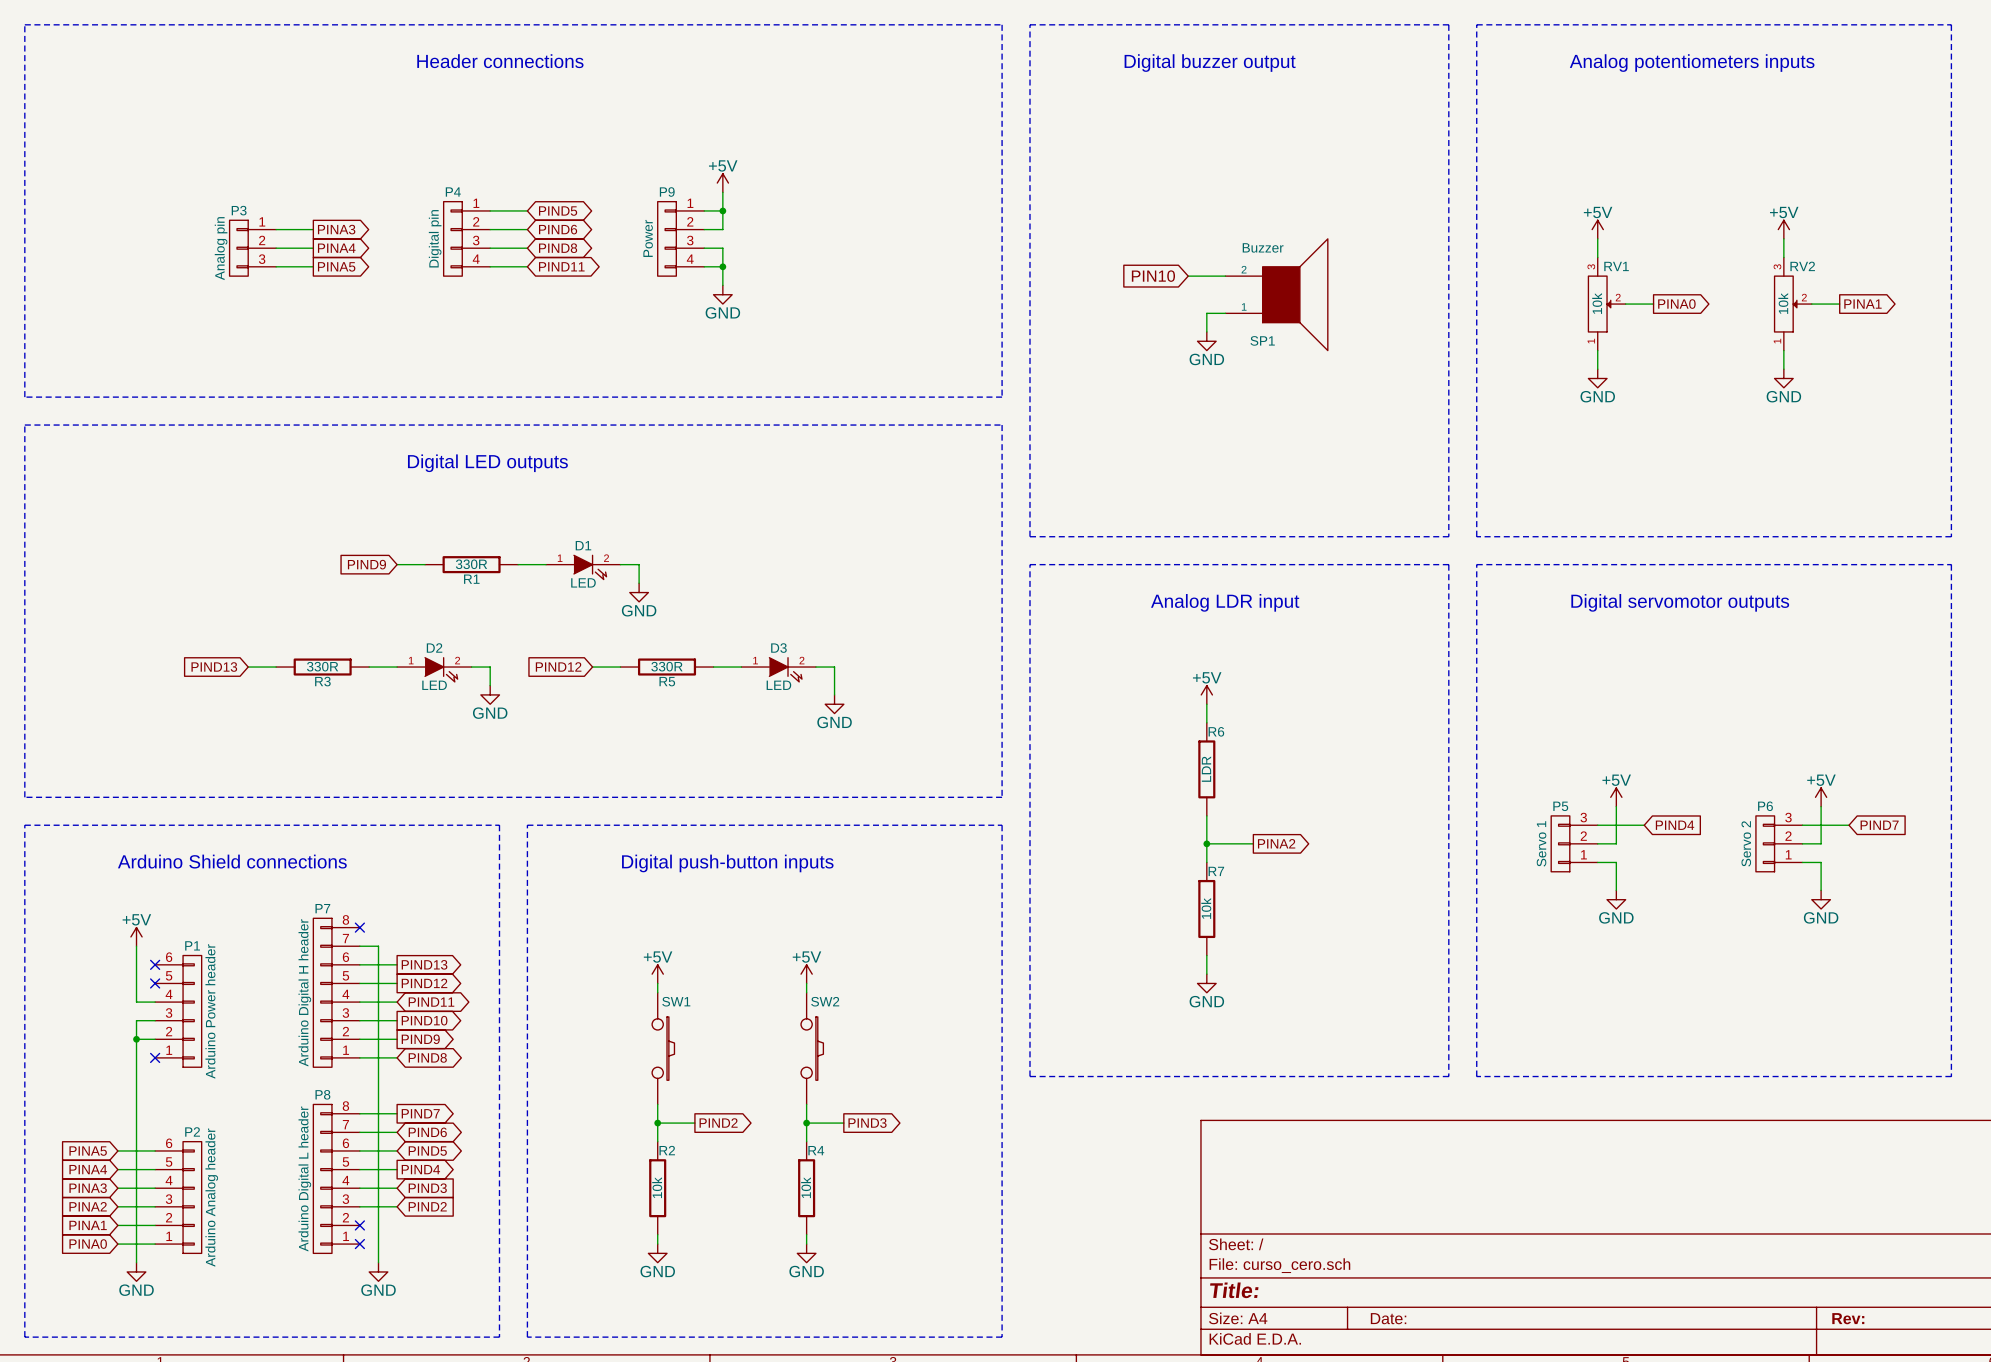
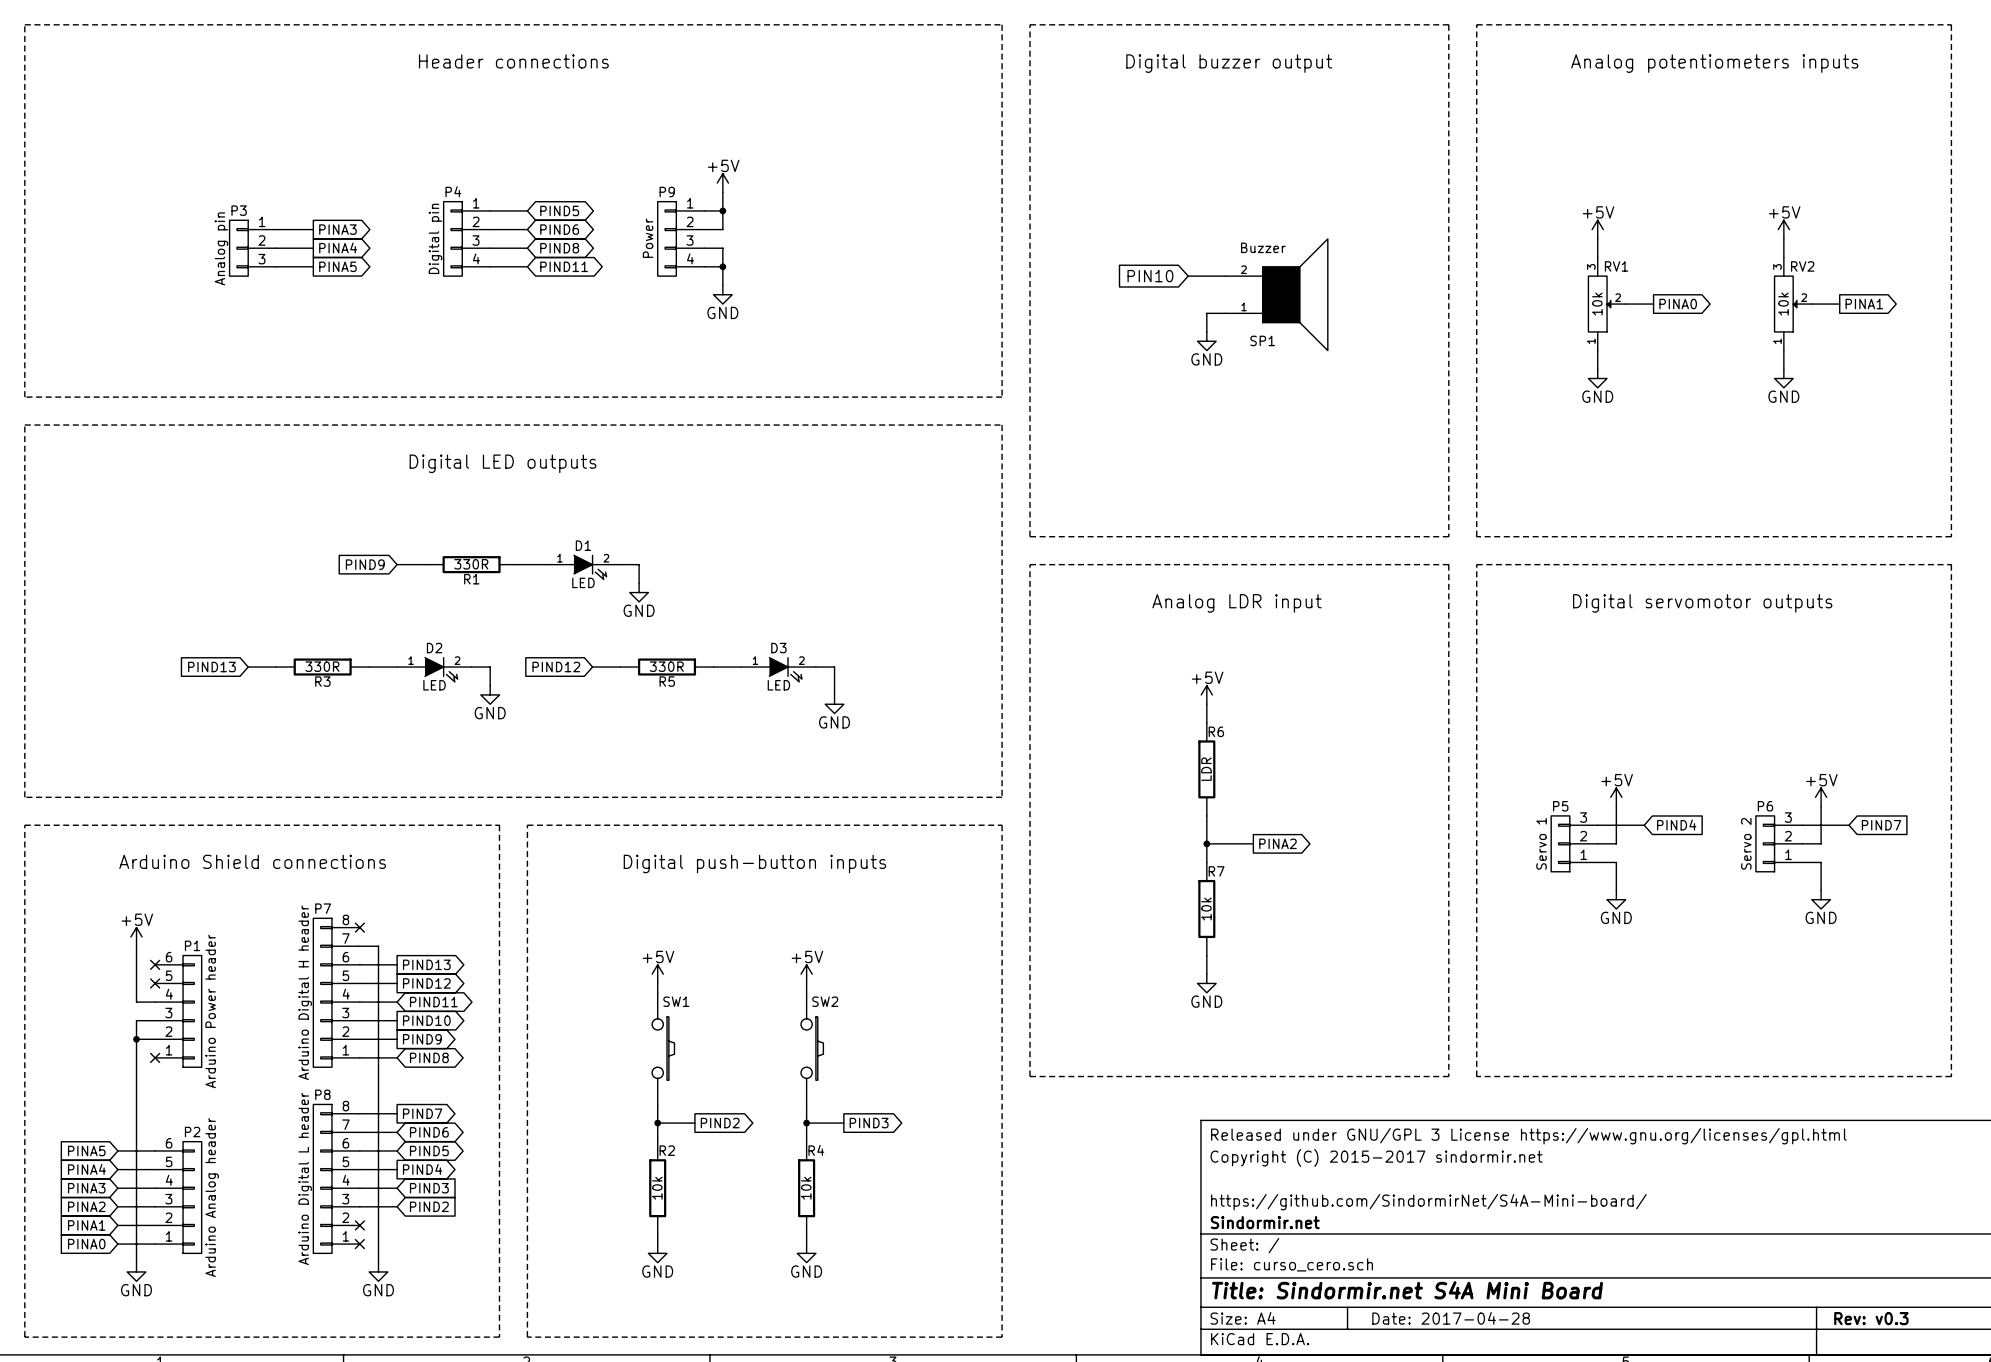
title block: none -> Released under GNU/GPL 3 License https://www.gnu.org/licenses/gpl.html (1528, 1136)
title block: none -> Copyright (C) 2015-2017 sindormir.net (1376, 1157)
title block: none -> https://github.com/SindormirNet/S4A-Mini-board/ (1428, 1202)
title block: none -> Sindormir.net (1265, 1222)
title block: Title: (1234, 1290) -> Title: Sindormir.net S4A Mini Board (1407, 1290)
title block: Date: (1388, 1318) -> Date: 2017-04-28 (1451, 1318)
title block: Rev: (1848, 1318) -> Rev: v0.3 (1871, 1318)

